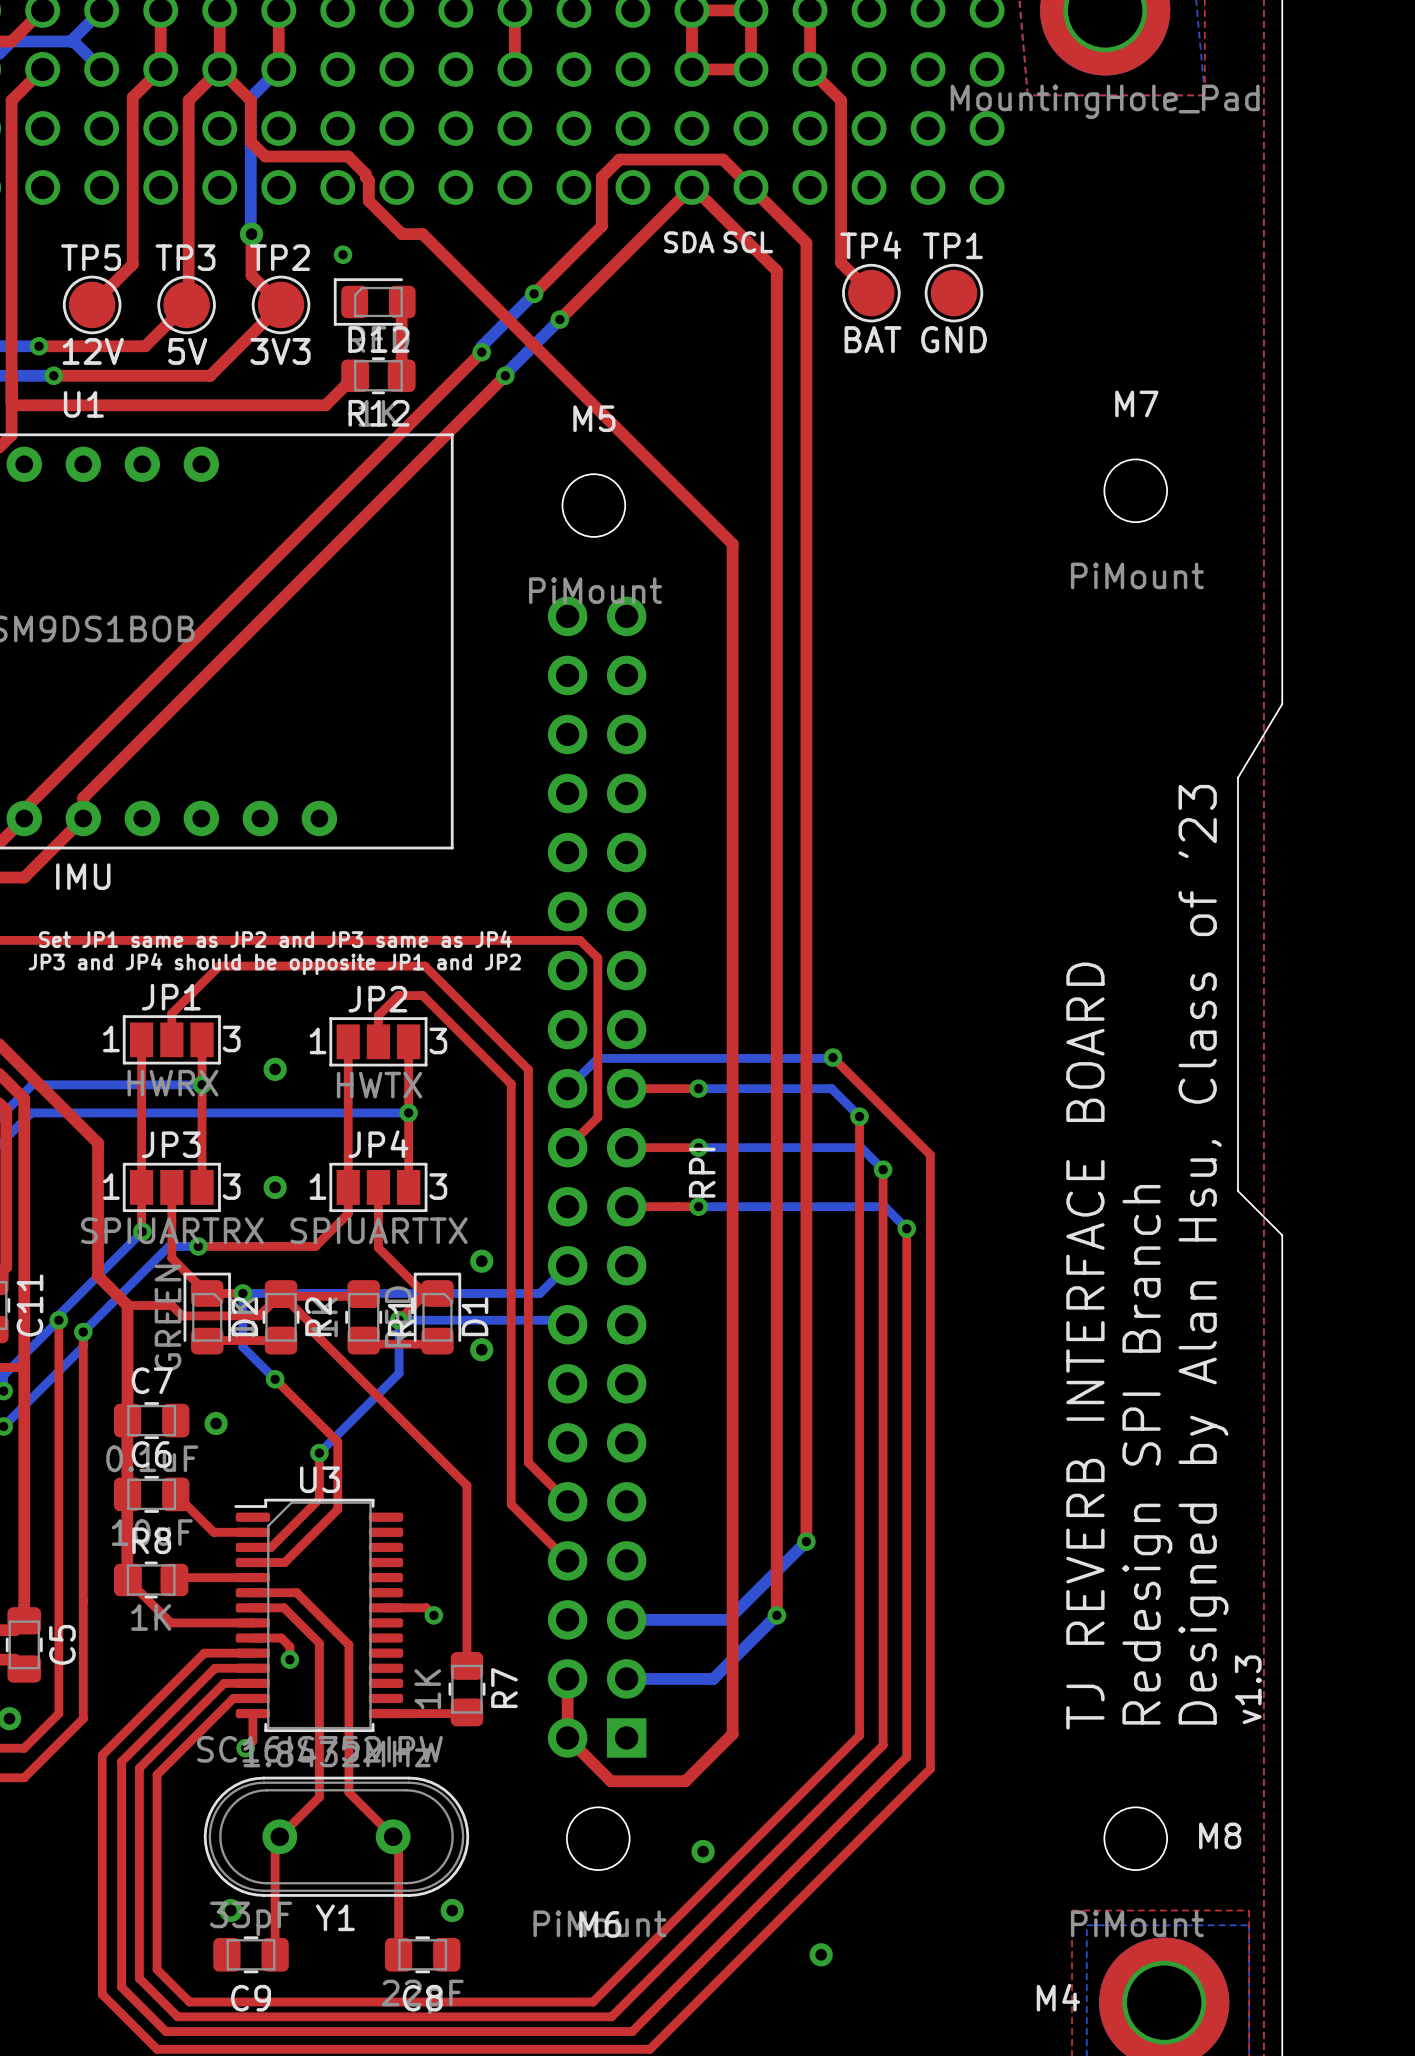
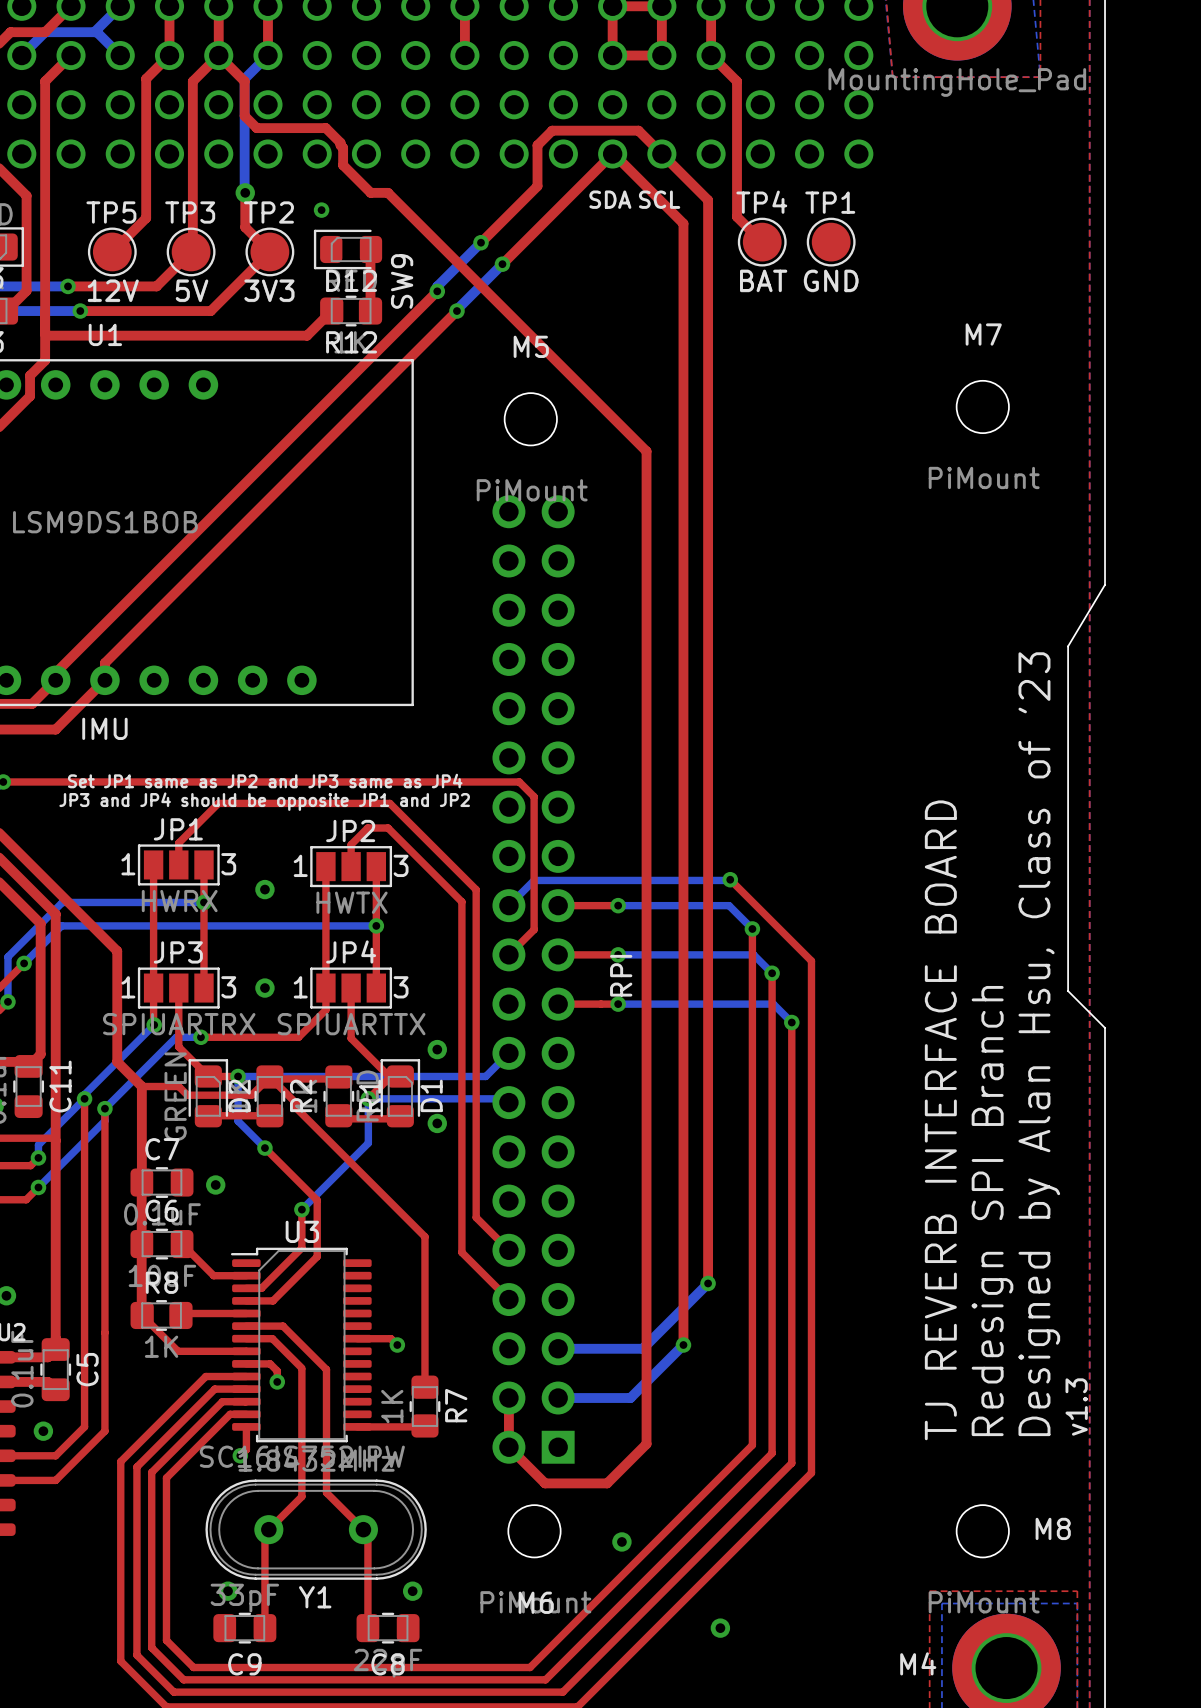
text: none -> SW9 (402, 281)

